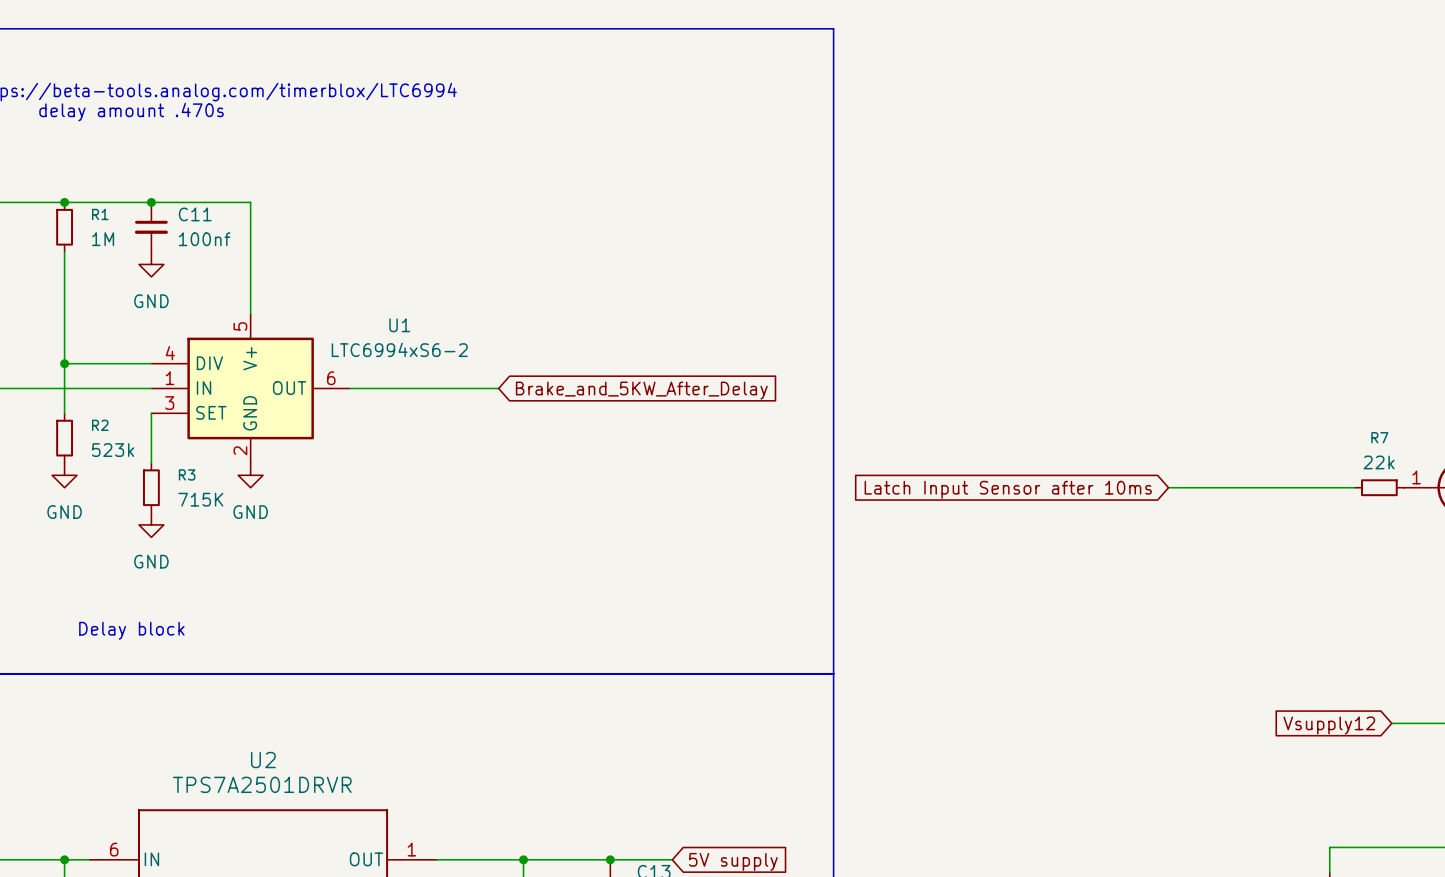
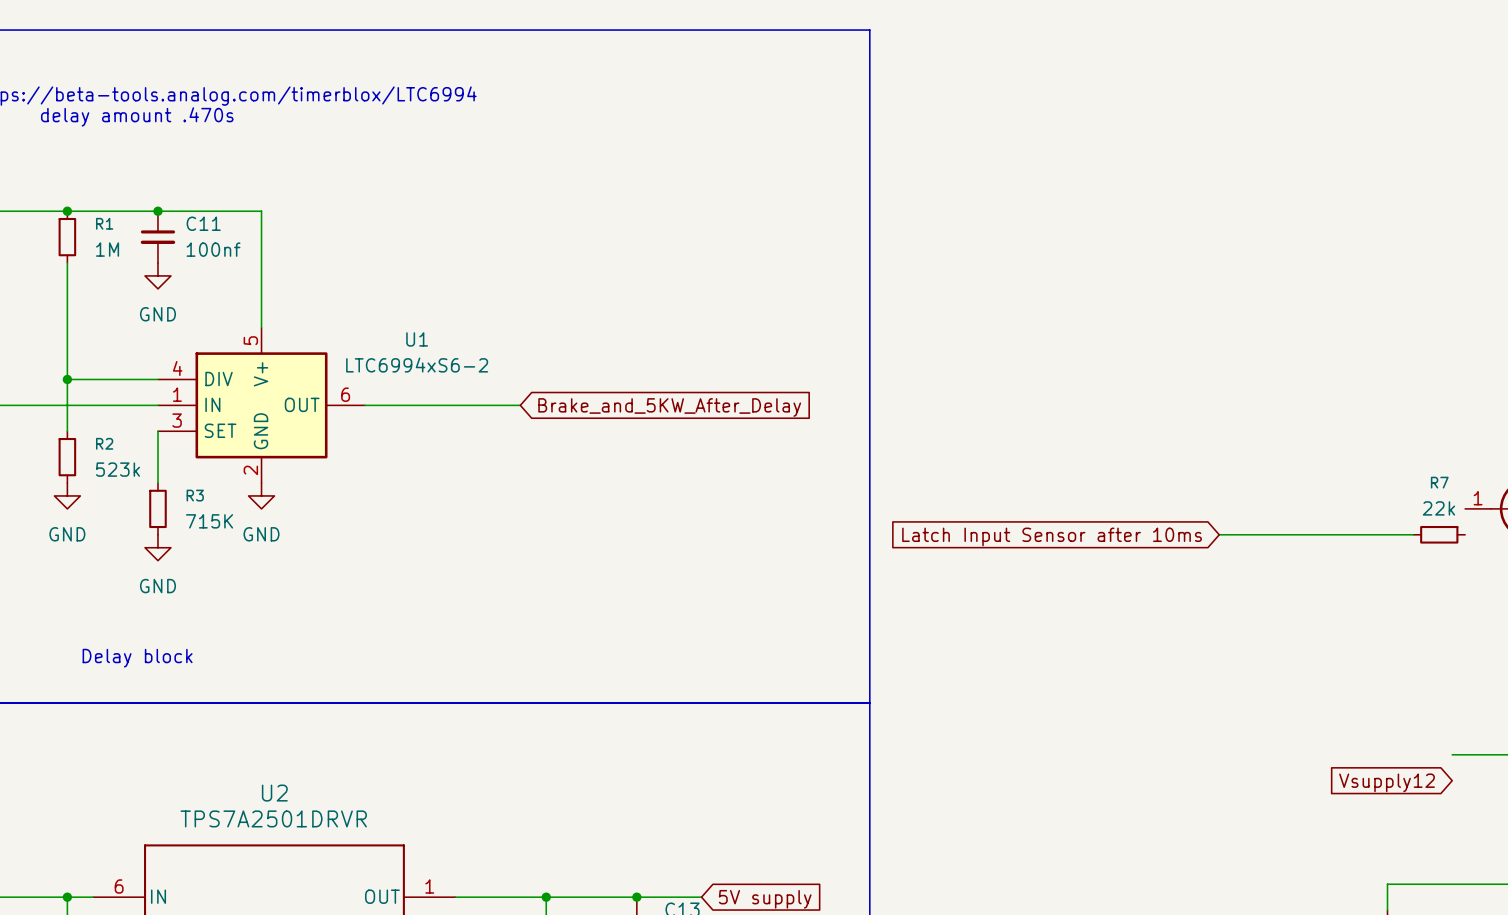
wire: (1168, 487) (1354, 487) -> (1219, 534) (1413, 534)
R7 position: (1379, 487) -> (1439, 534)
global label position: Latch Input Sensor after 10ms (1008, 489) -> Latch Input Sensor after 10ms (1052, 536)
global label position: Vsupply12 (1329, 725) -> Vsupply12 (1387, 782)

